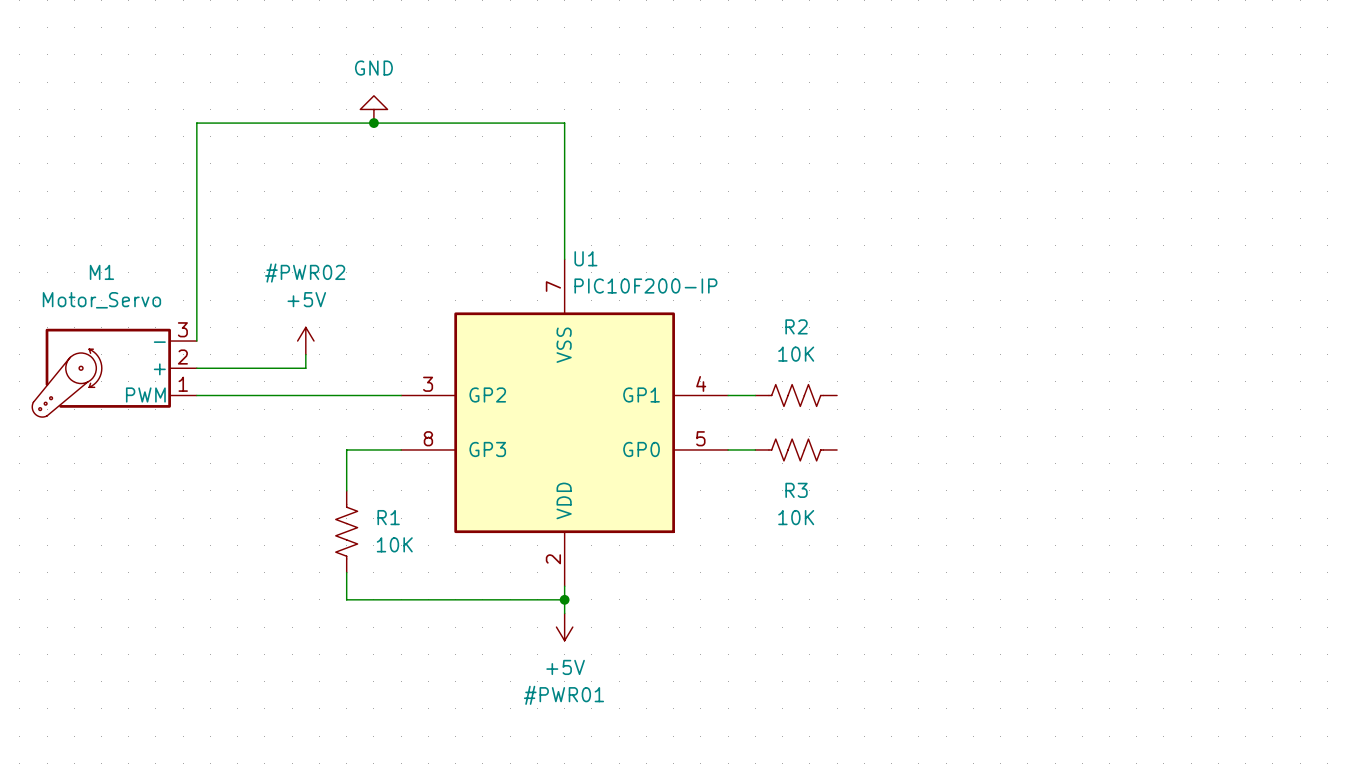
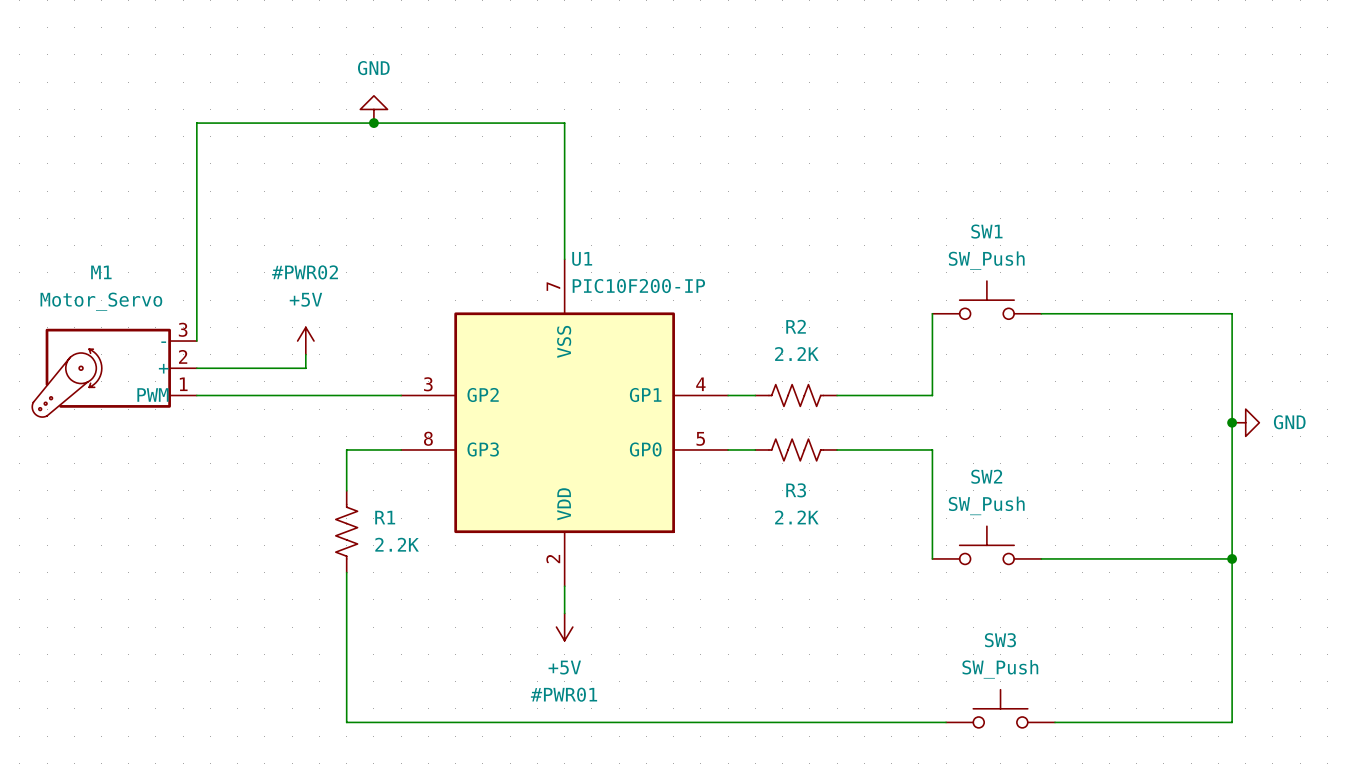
SW1: none -> SW_Push (986, 300)
wire: none -> (932, 313) (932, 395) (837, 395)
wire: none -> (1041, 313) (1232, 313) (1232, 722) (1055, 722)
R2 value: 10K (796, 354) -> 2.2K (796, 354)
junction: none -> (1232, 422)
power symbol: none -> GND (1245, 422)
wire: none -> (837, 449) (932, 449) (932, 558)
R3 value: 10K (796, 517) -> 2.2K (796, 517)
R1 value: 10K (394, 544) -> 2.2K (397, 544)
SW2: none -> SW_Push (986, 545)
wire: none -> (1041, 558) (1232, 558)
junction: none -> (1232, 558)
wire: (346, 599) (564, 599) -> (346, 599) (346, 722) (946, 722)
junction: (564, 599) -> none
SW3: none -> SW_Push (1000, 708)

